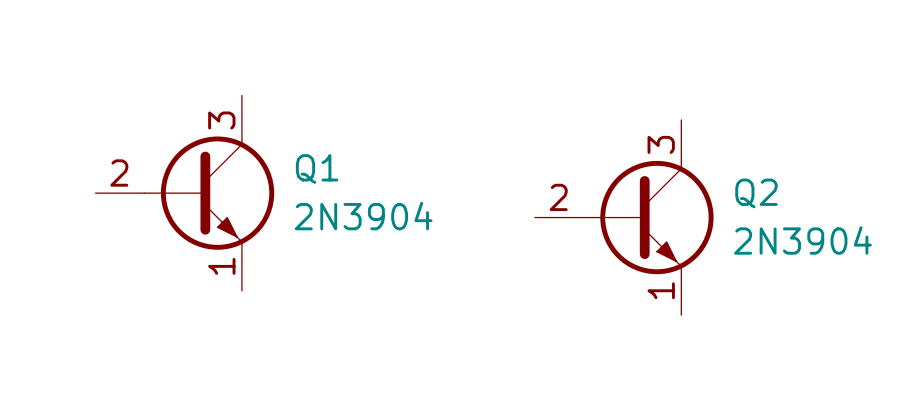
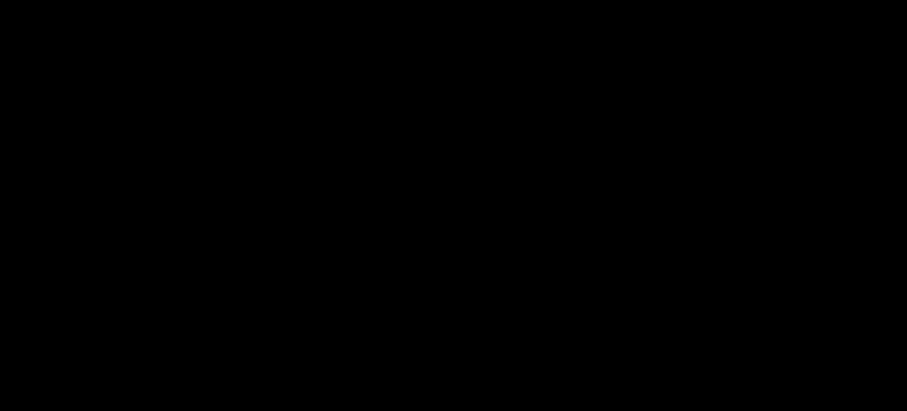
Q1: 2N3904 (184, 193) -> none
Q2: 2N3904 (624, 217) -> none

